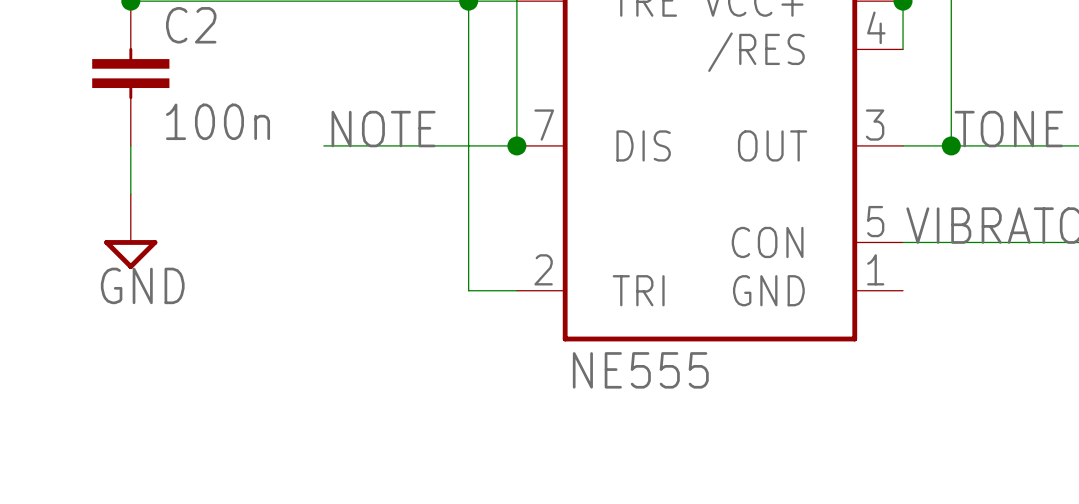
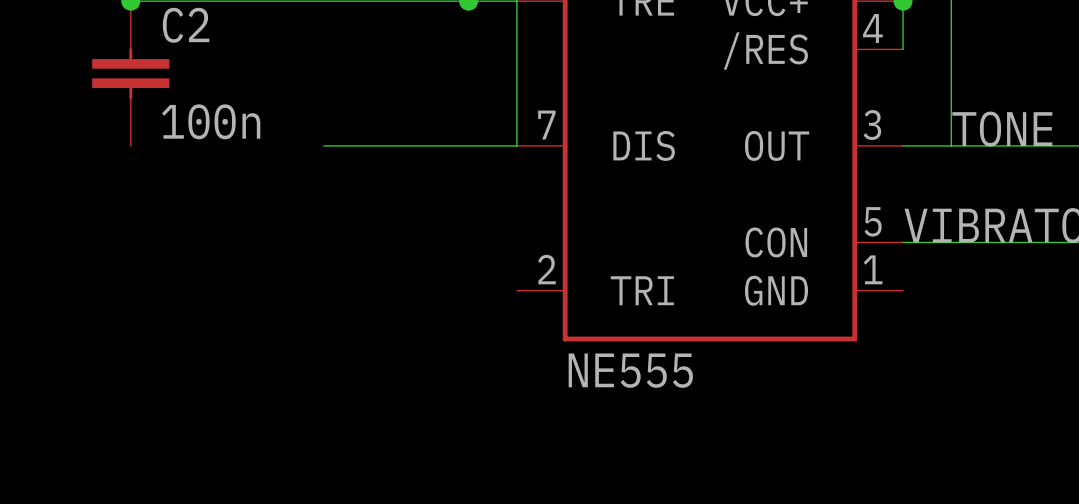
wire: (468, 1) (468, 290) (516, 290) -> none
label: NOTE (383, 129) -> none
wire: (130, 145) (130, 194) -> none
junction: (516, 145) -> none
junction: (951, 145) -> none
power symbol: GND (130, 231) -> none

